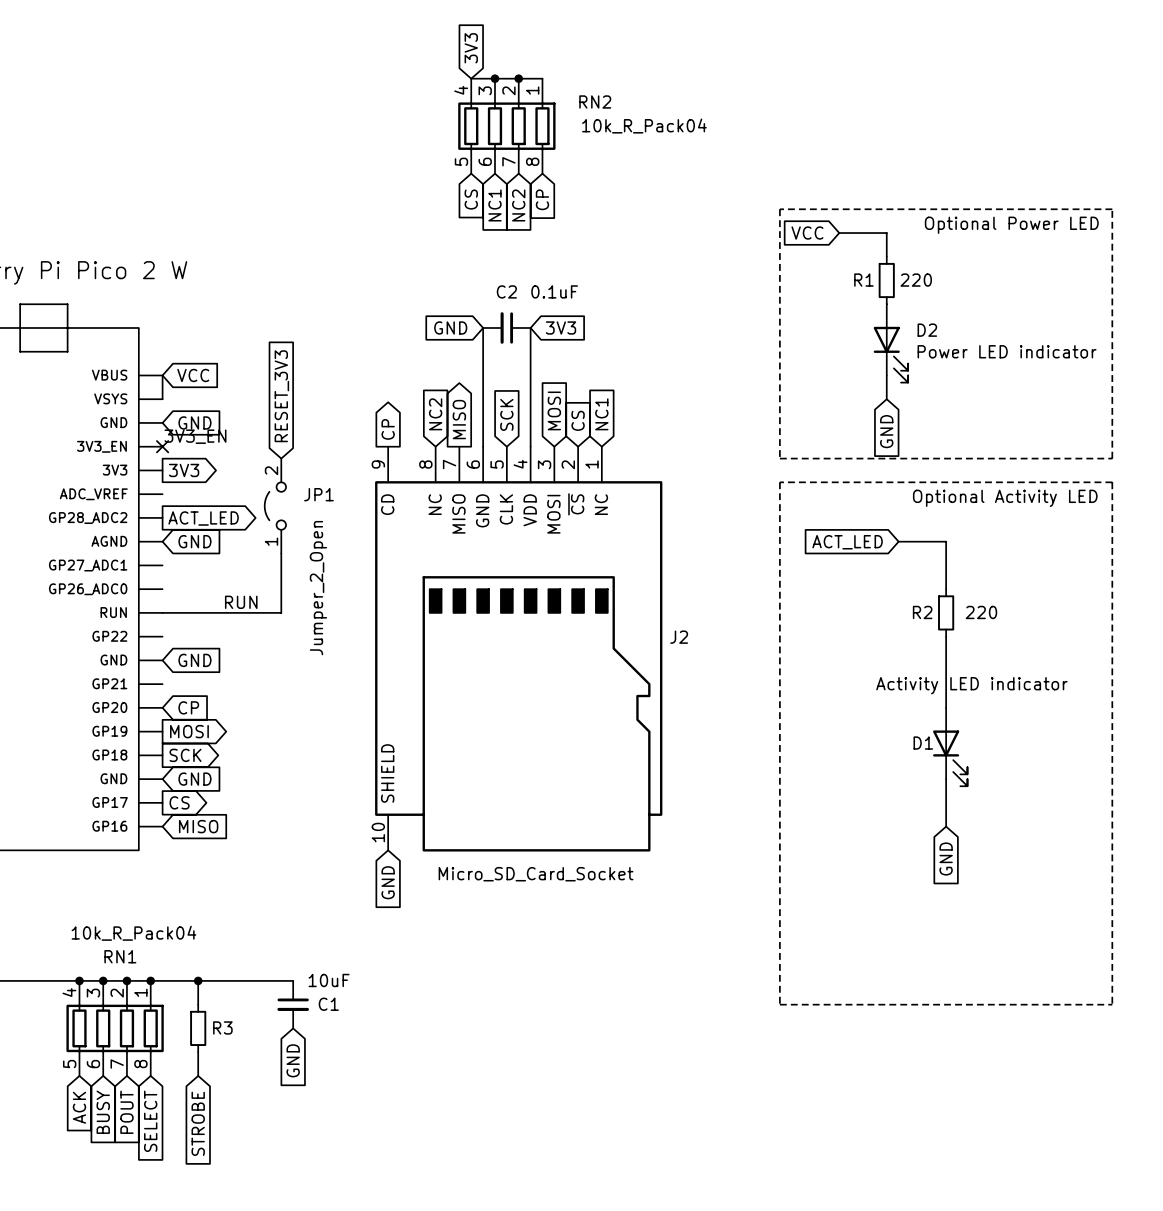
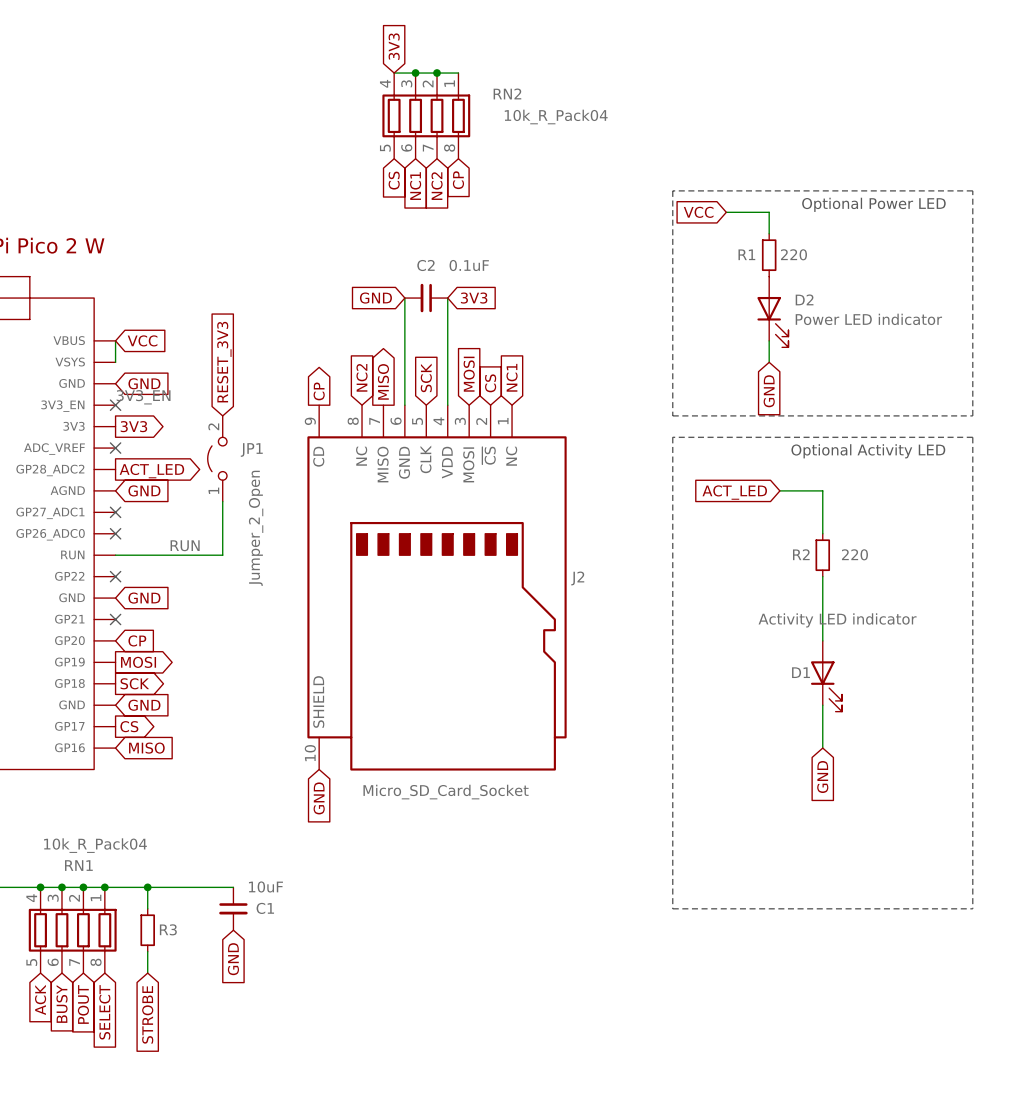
no-connect mark: none -> (115, 448)
no-connect mark: none -> (115, 512)
no-connect mark: none -> (115, 533)
no-connect mark: none -> (115, 576)
no-connect mark: none -> (115, 619)

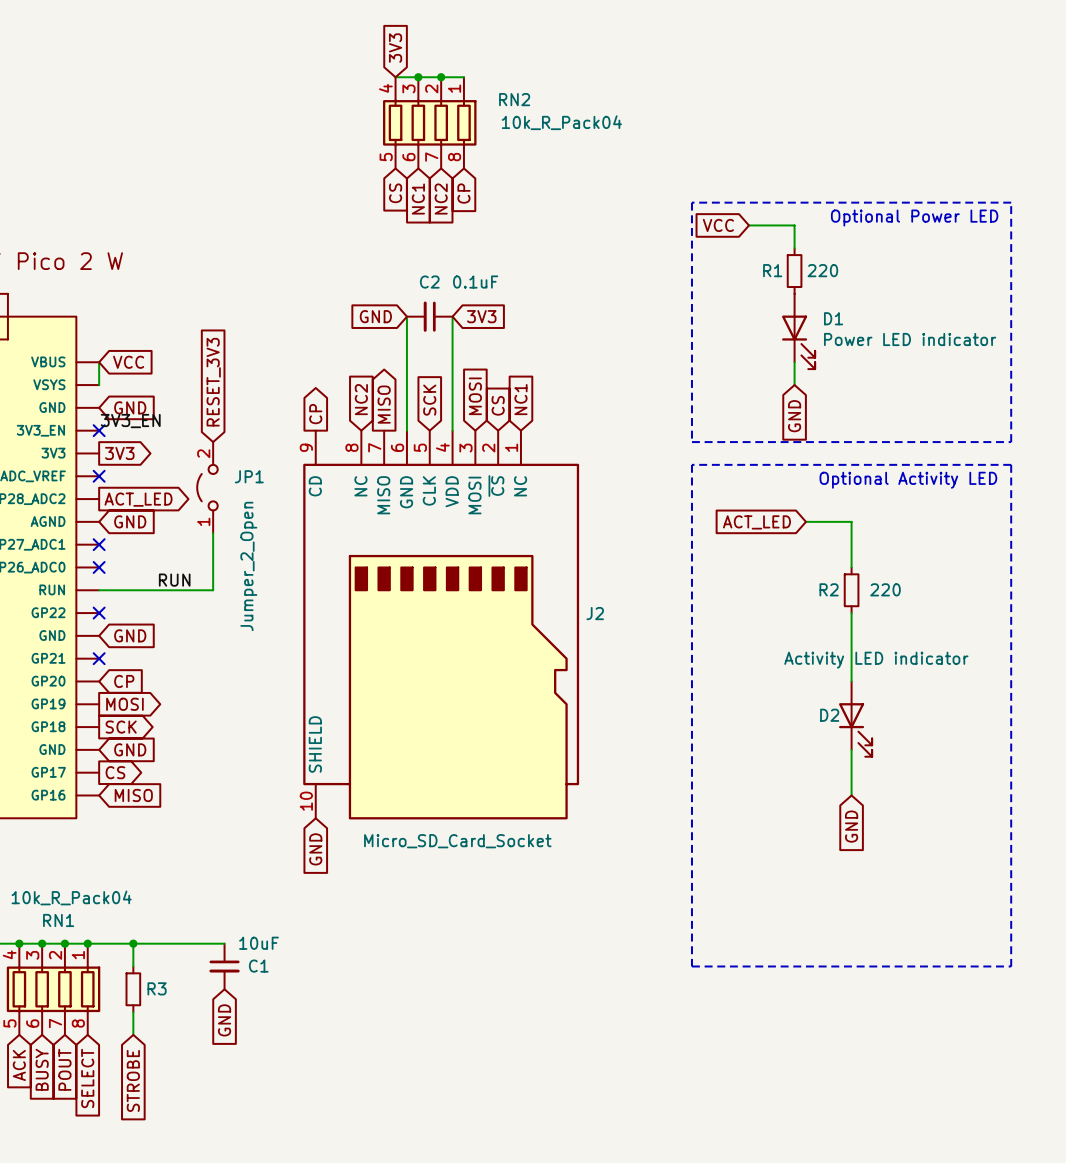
D2 name: D2 (804, 299) -> D1 (833, 318)
D1 name: D1 (800, 672) -> D2 (829, 715)

